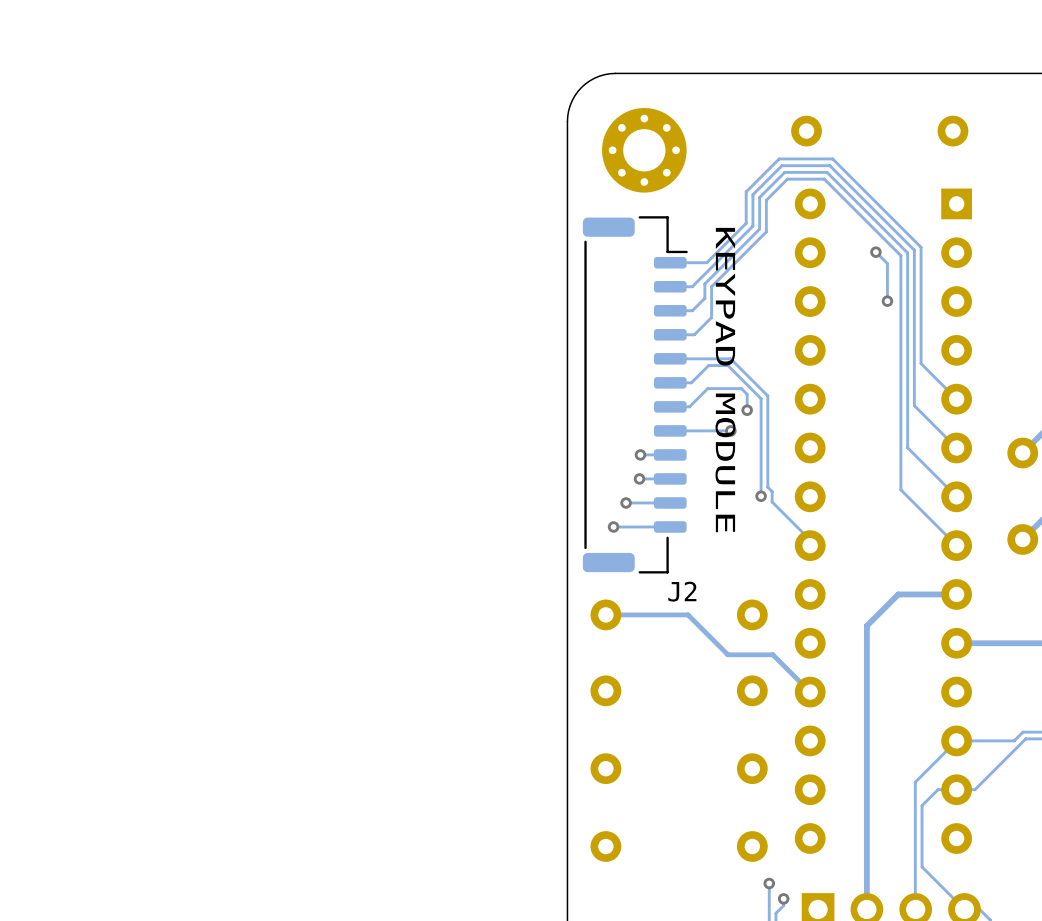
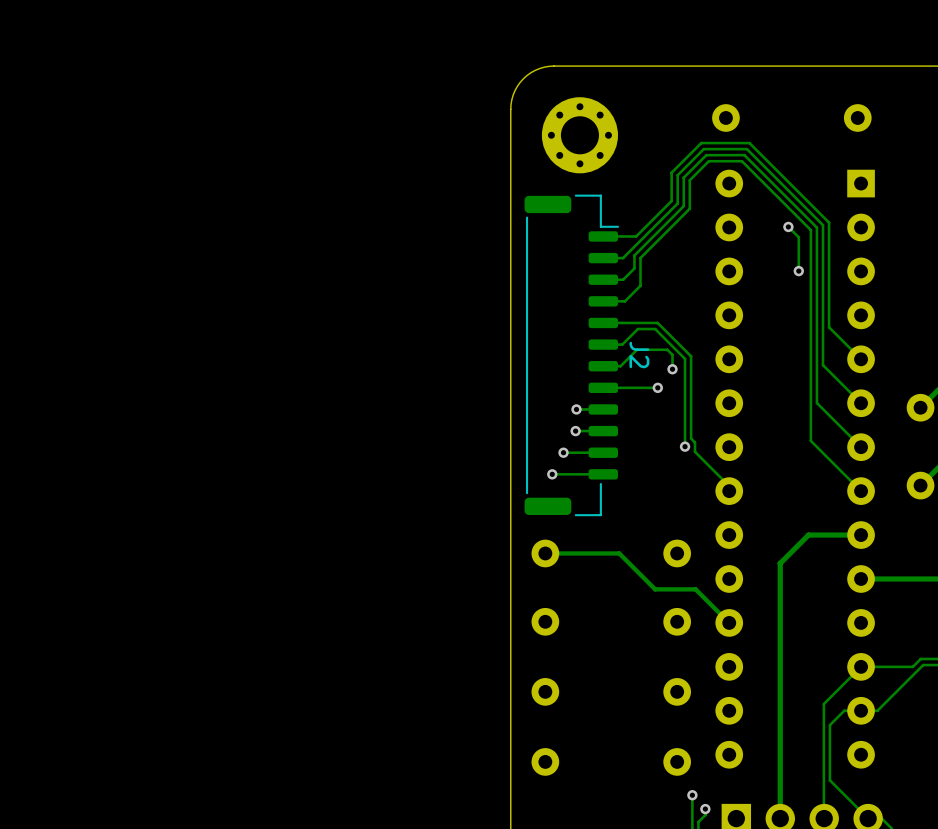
text: KEYPAD MODULE (725, 380) -> none
J2 name rotation: 0° (682, 591) -> 90° clockwise (639, 354)
J2 name position: J2 (682, 591) -> J2 (639, 354)

